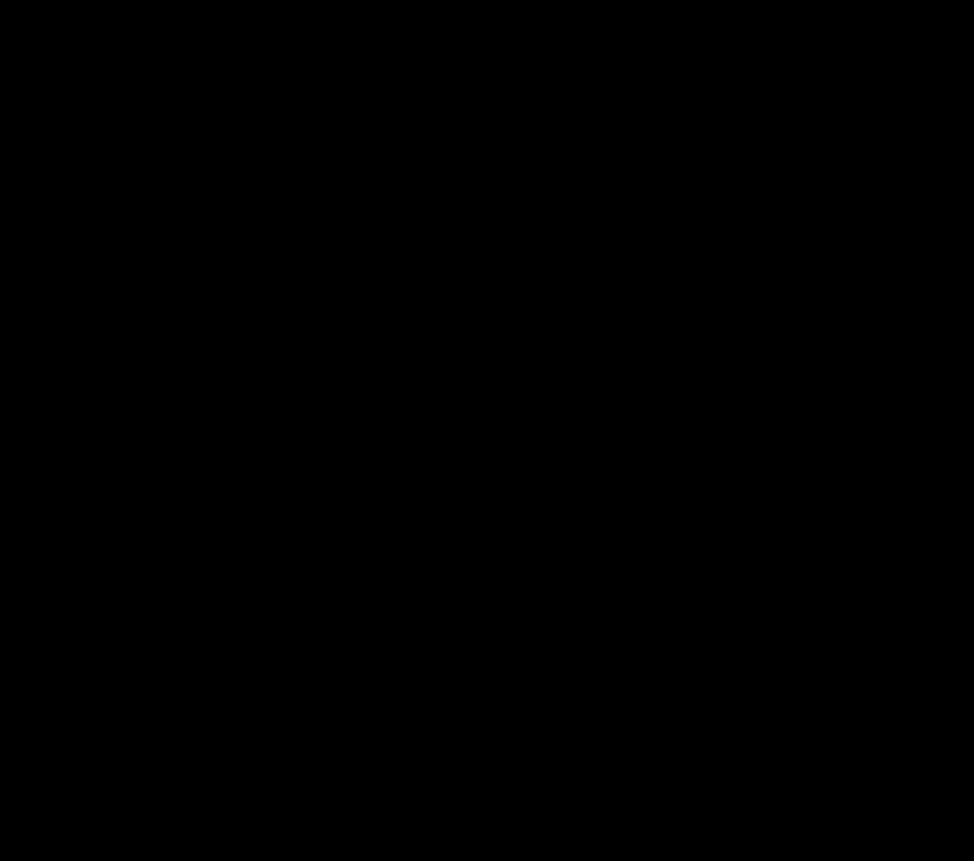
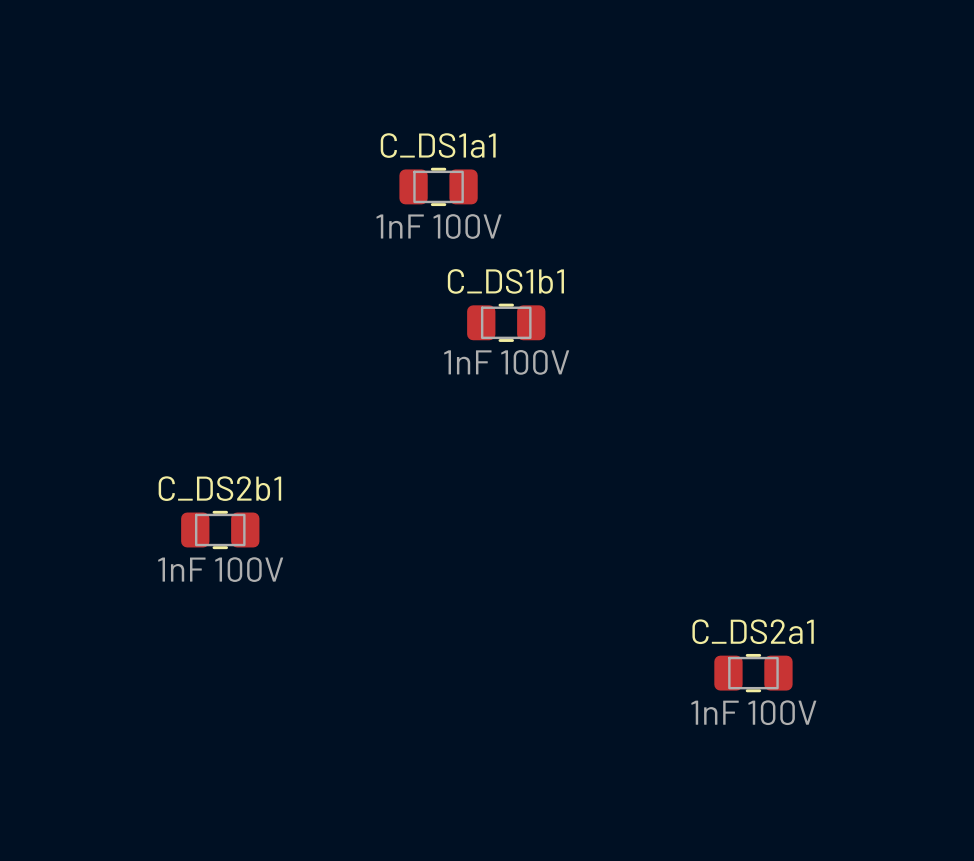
C_DS1a1: none -> 1nF 100V (438, 186)
C_DS1b1: none -> 1nF 100V (506, 322)
C_DS2b1: none -> 1nF 100V (220, 529)
C_DS2a1: none -> 1nF 100V (753, 673)

